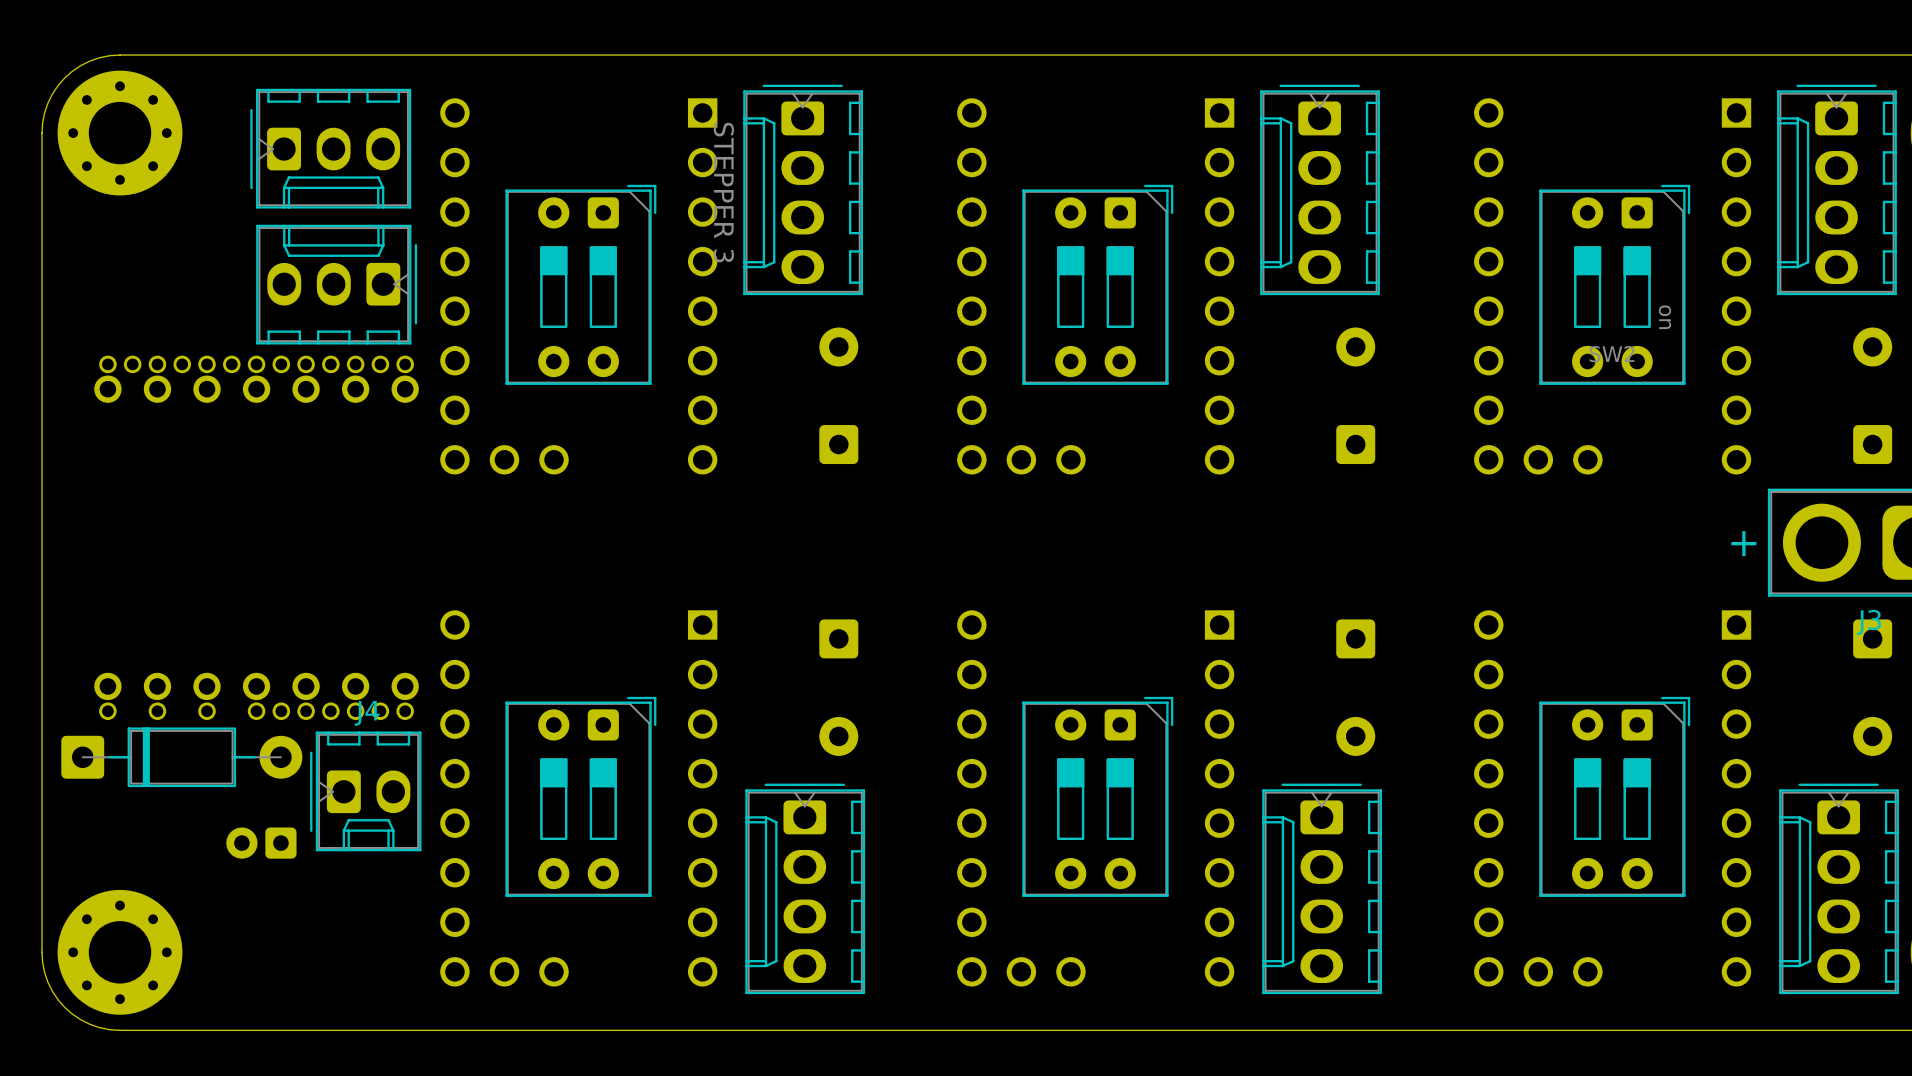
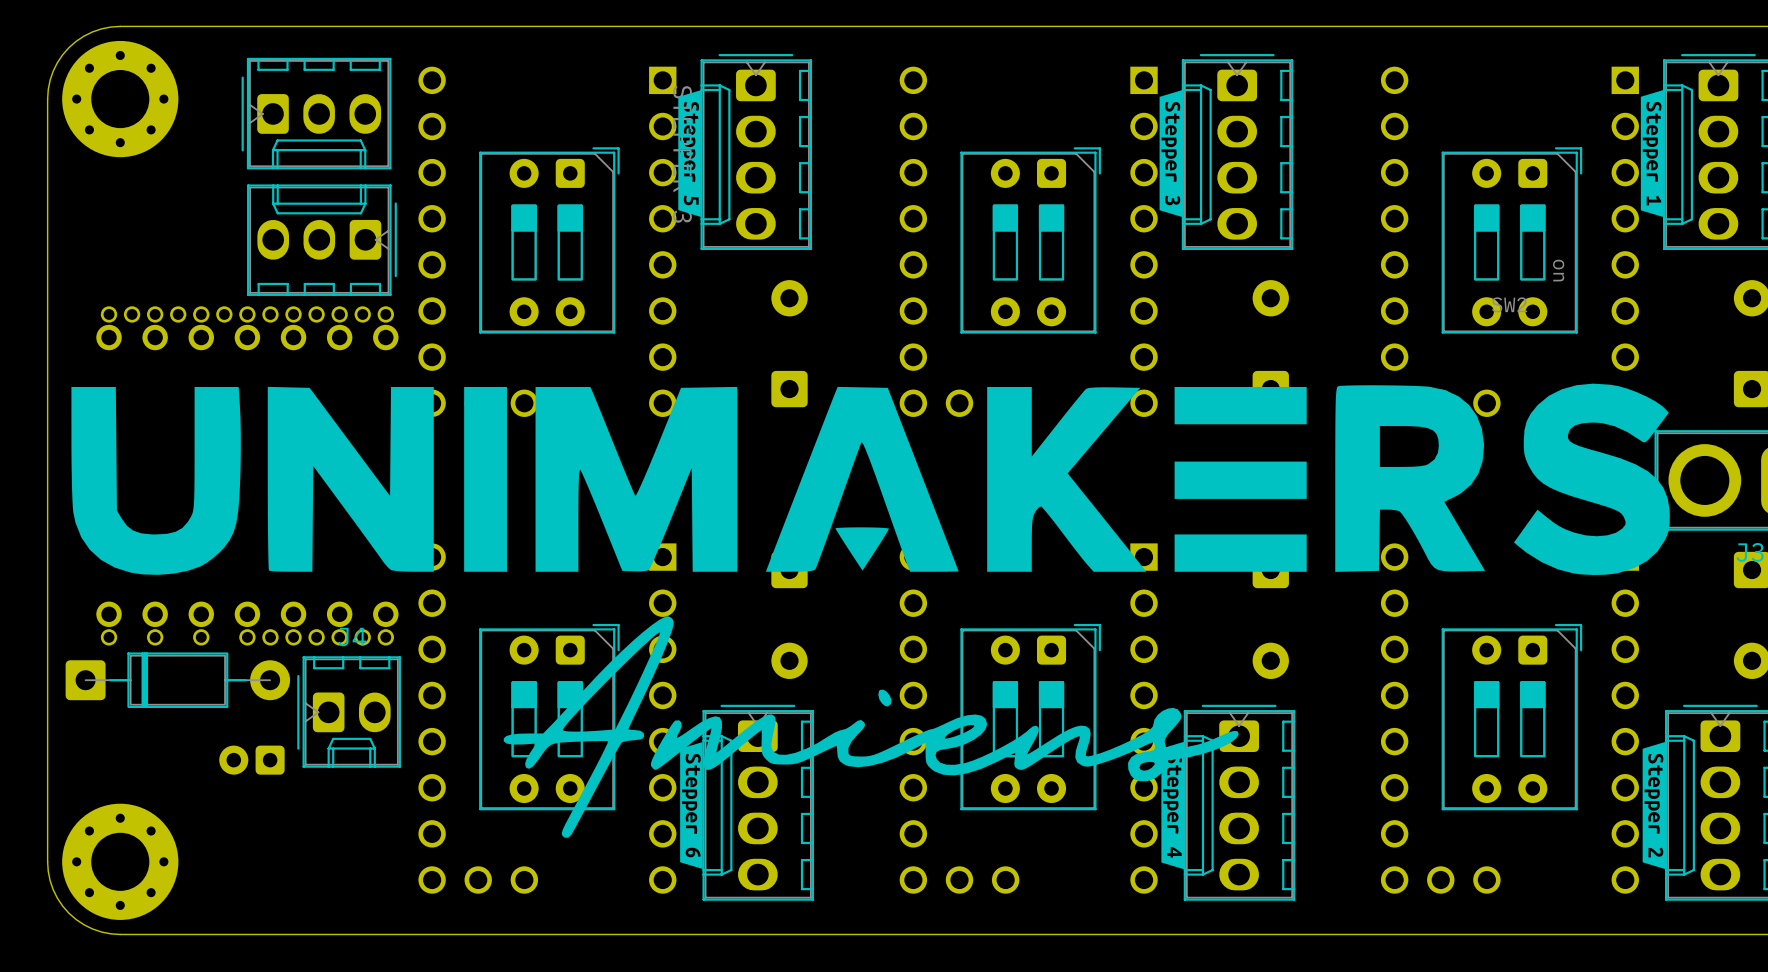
drawing: none -> [678, 90, 701, 217]
drawing: none -> [1159, 90, 1183, 217]
drawing: none -> [1640, 90, 1664, 218]
drawing: none -> [71, 383, 1670, 870]

